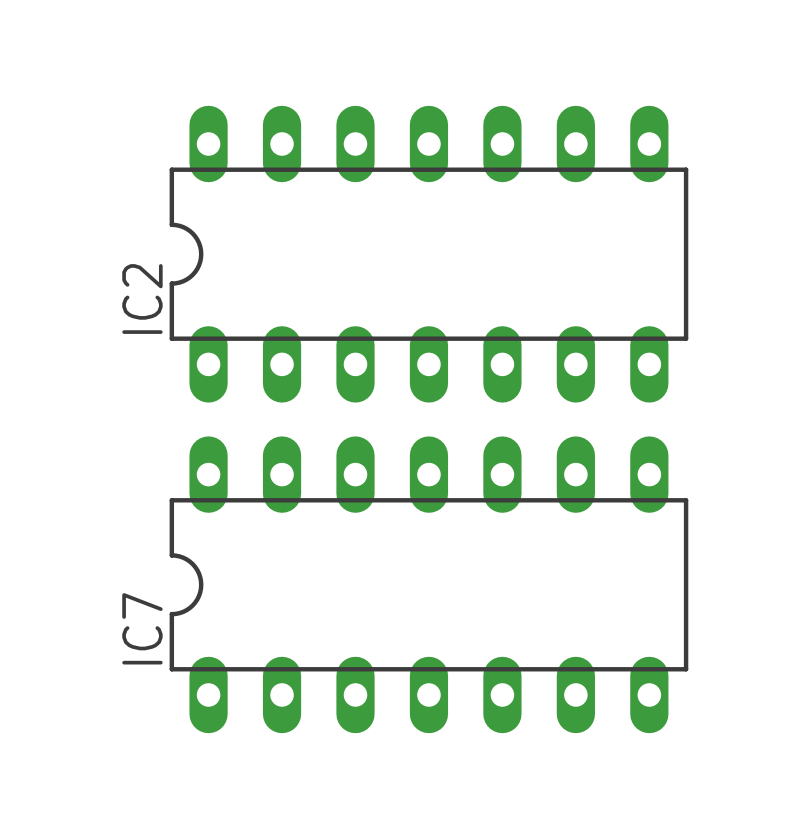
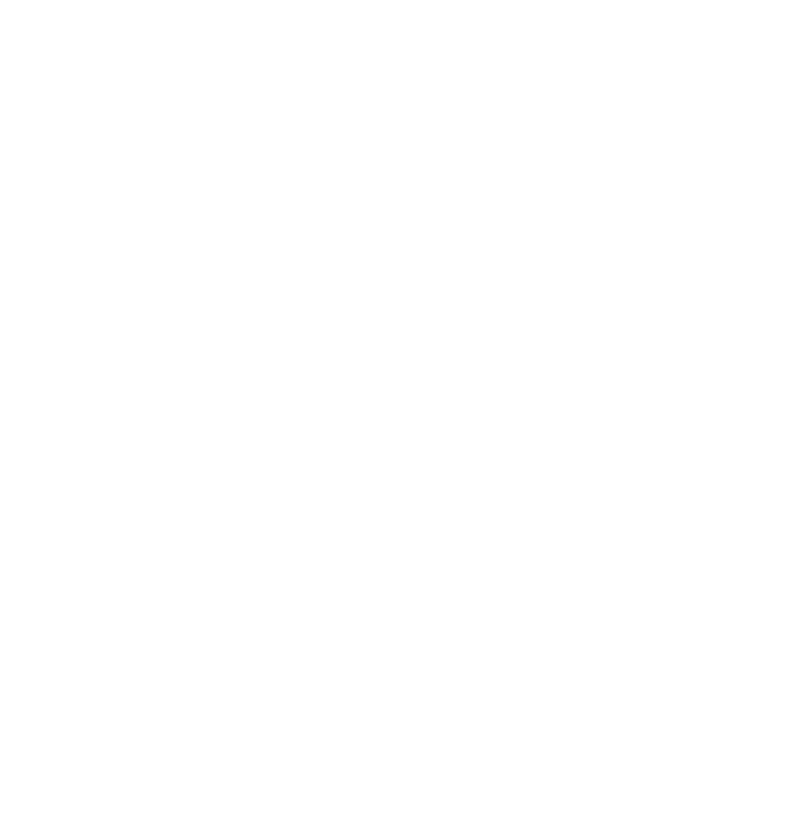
IC2: (428, 254) -> none
IC7: (428, 584) -> none

